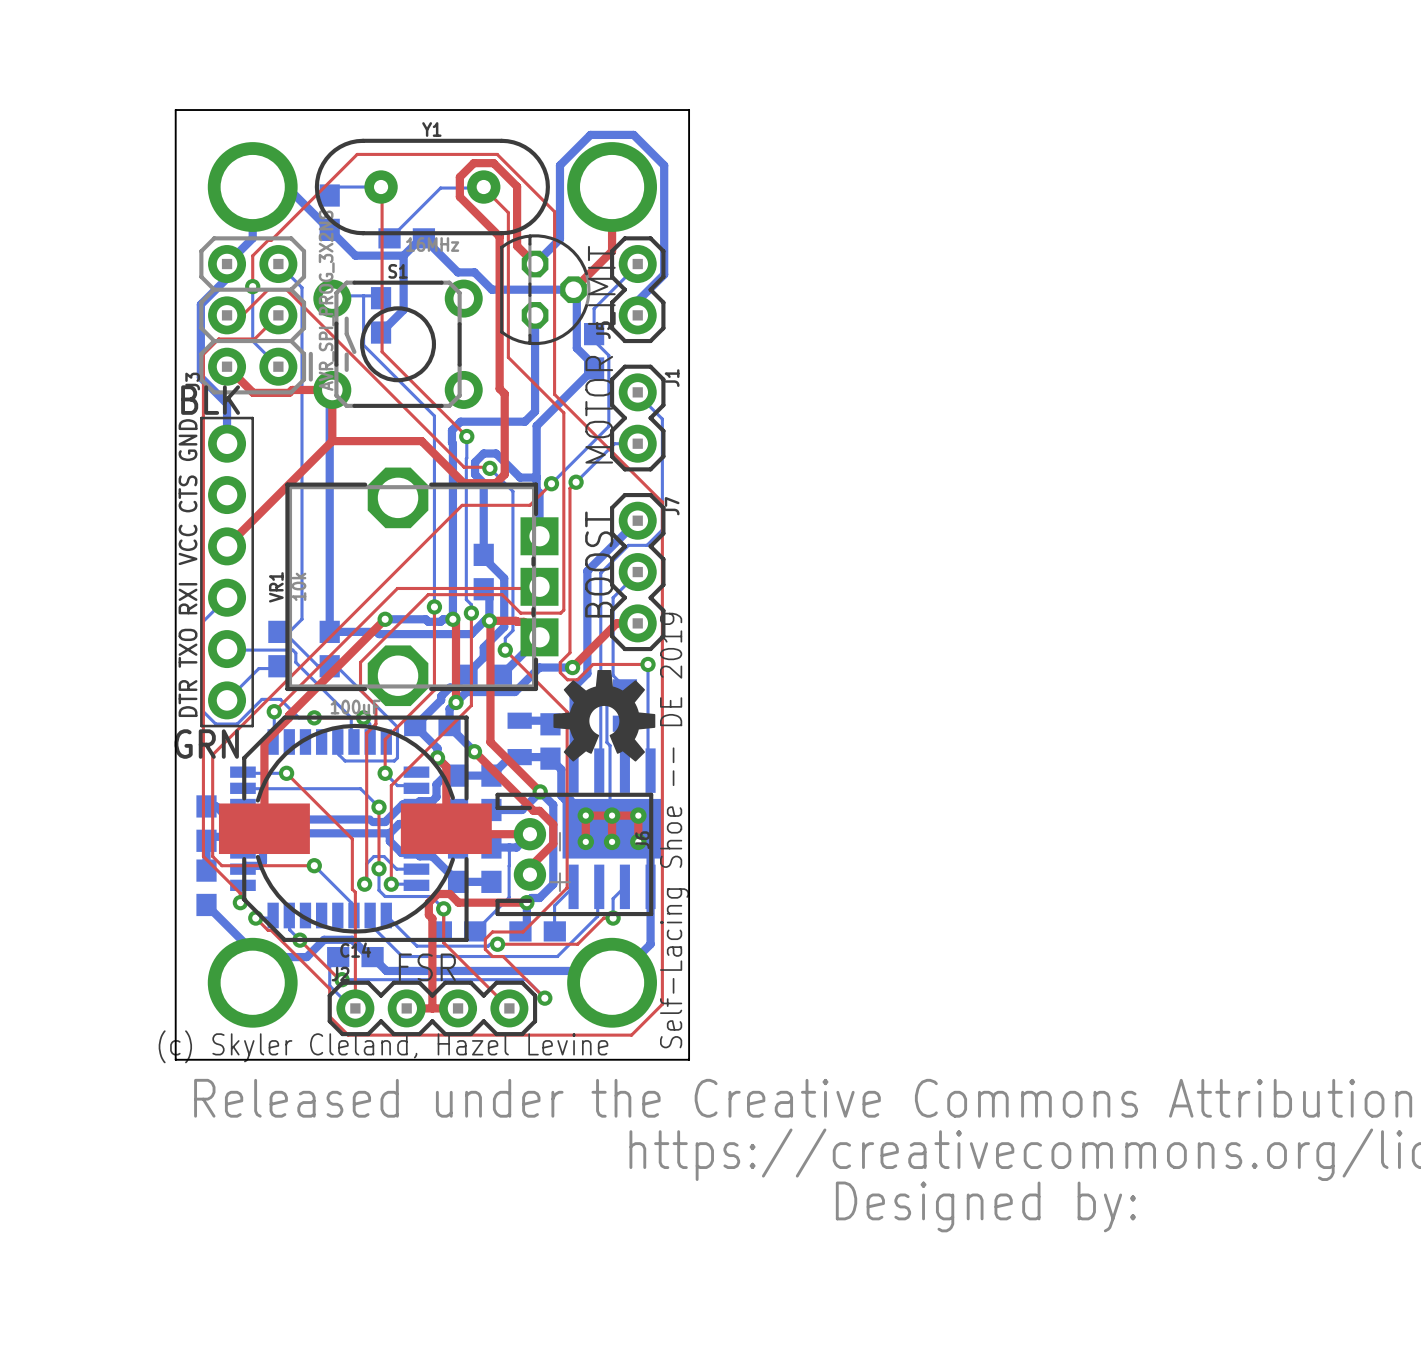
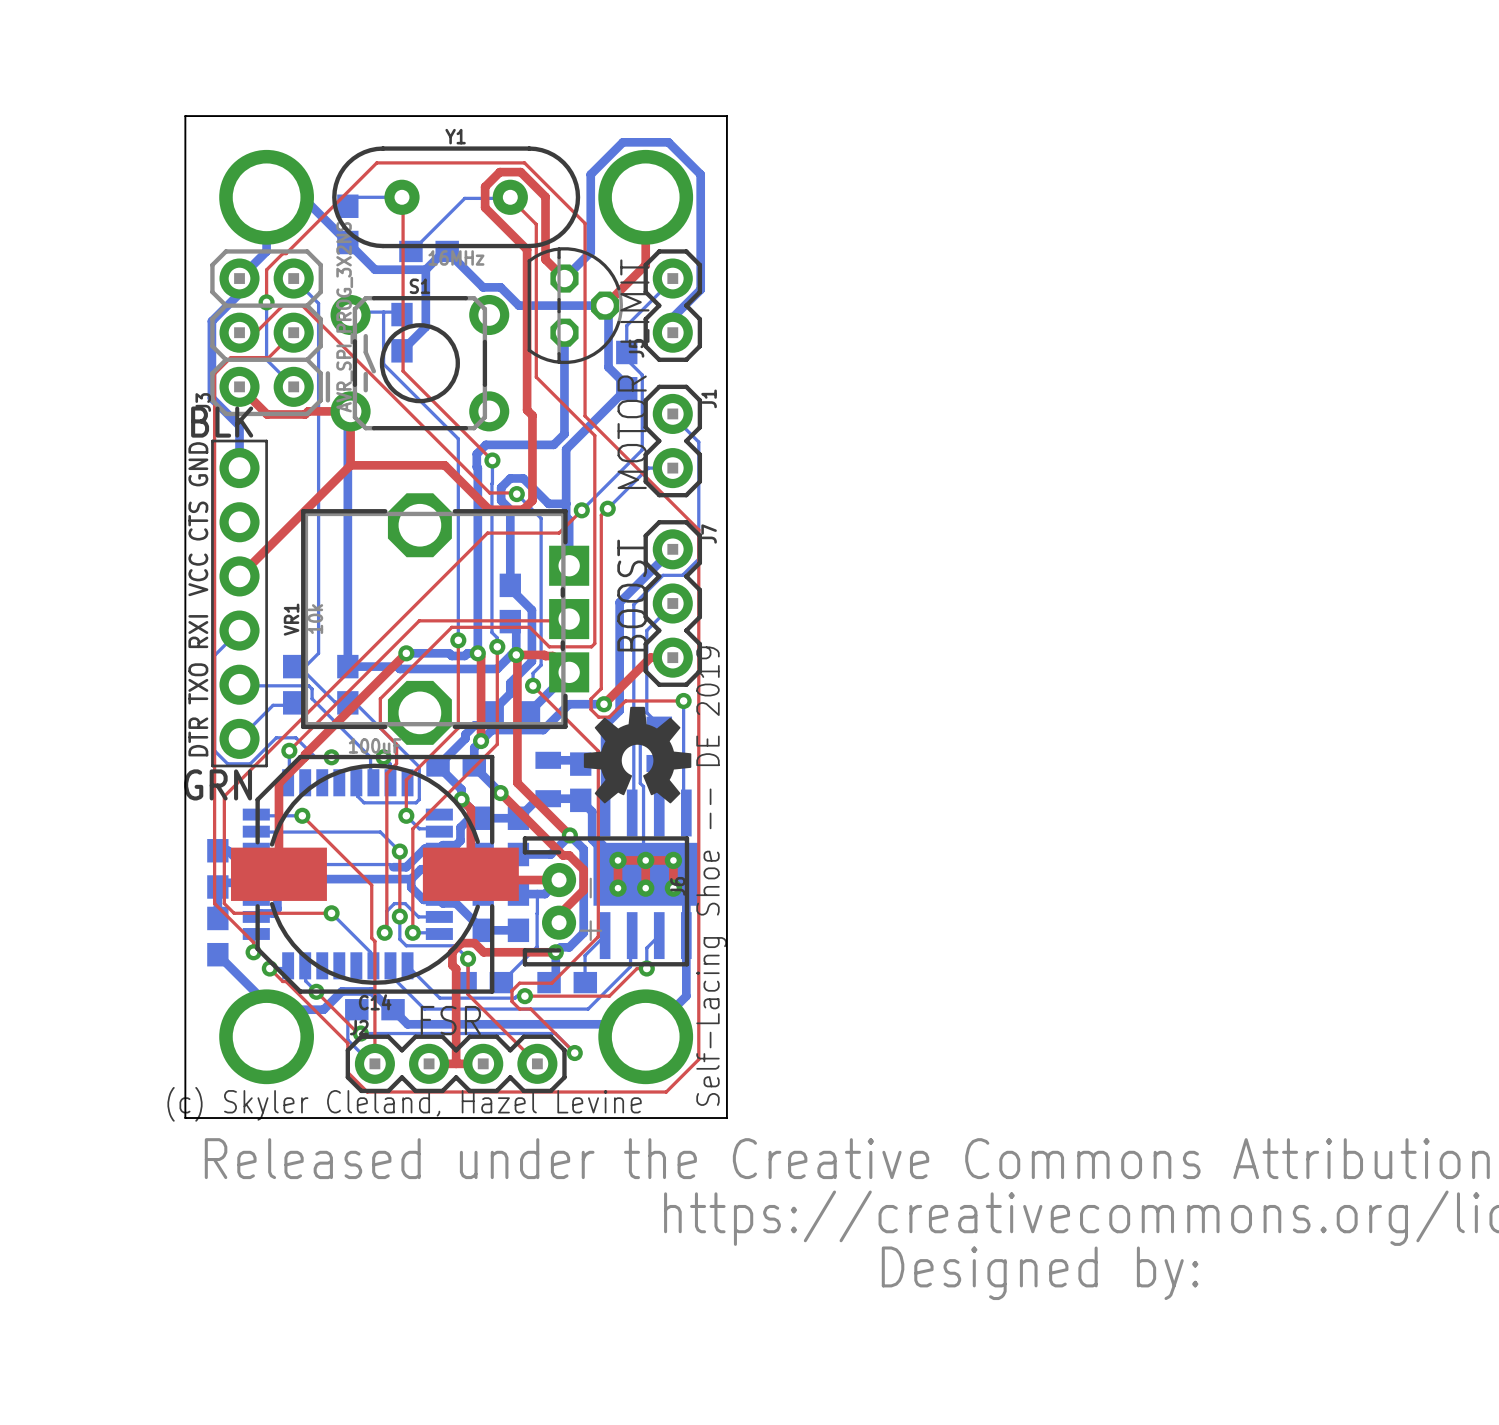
bottom track width: thick (243, 819) (369, 819) -> thin (256, 864) (390, 864)

